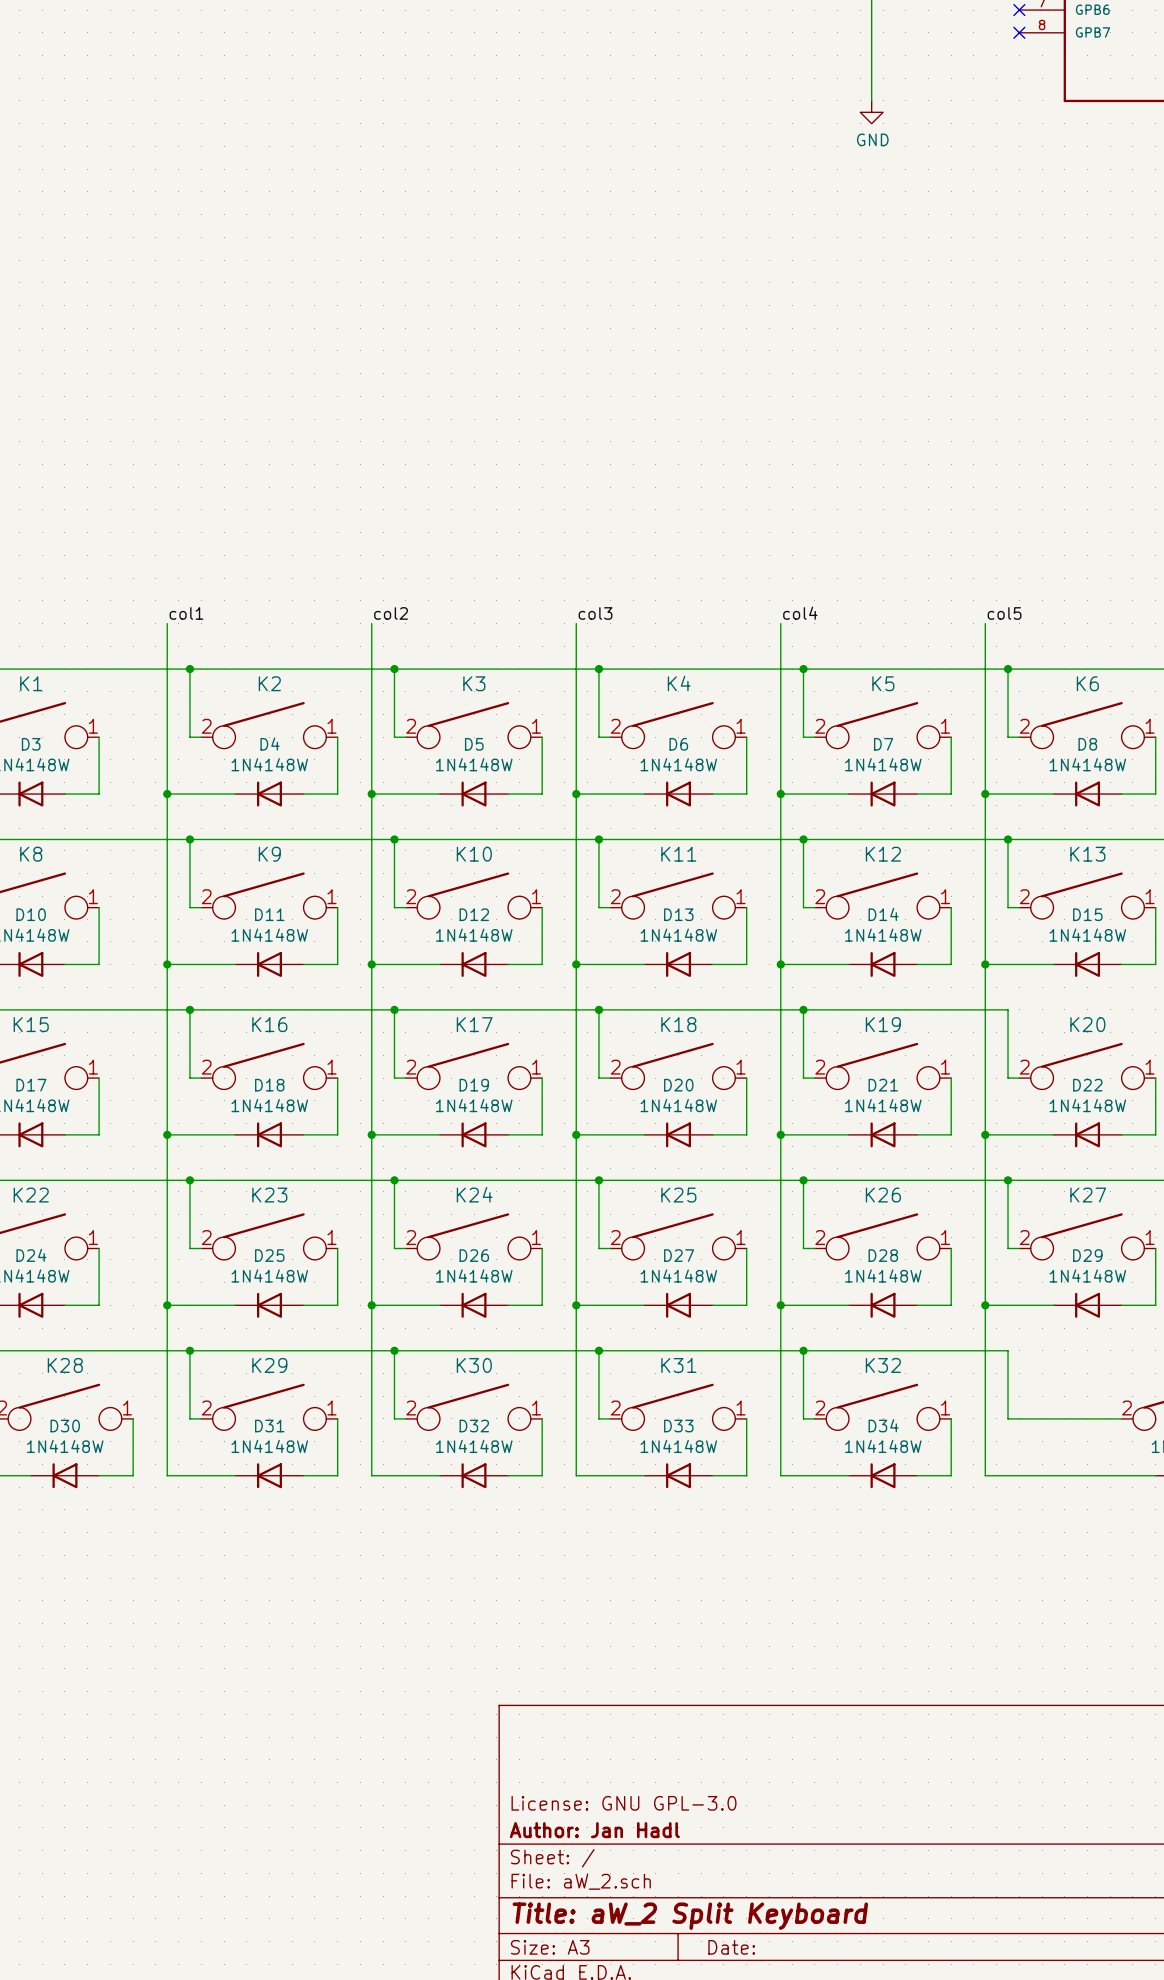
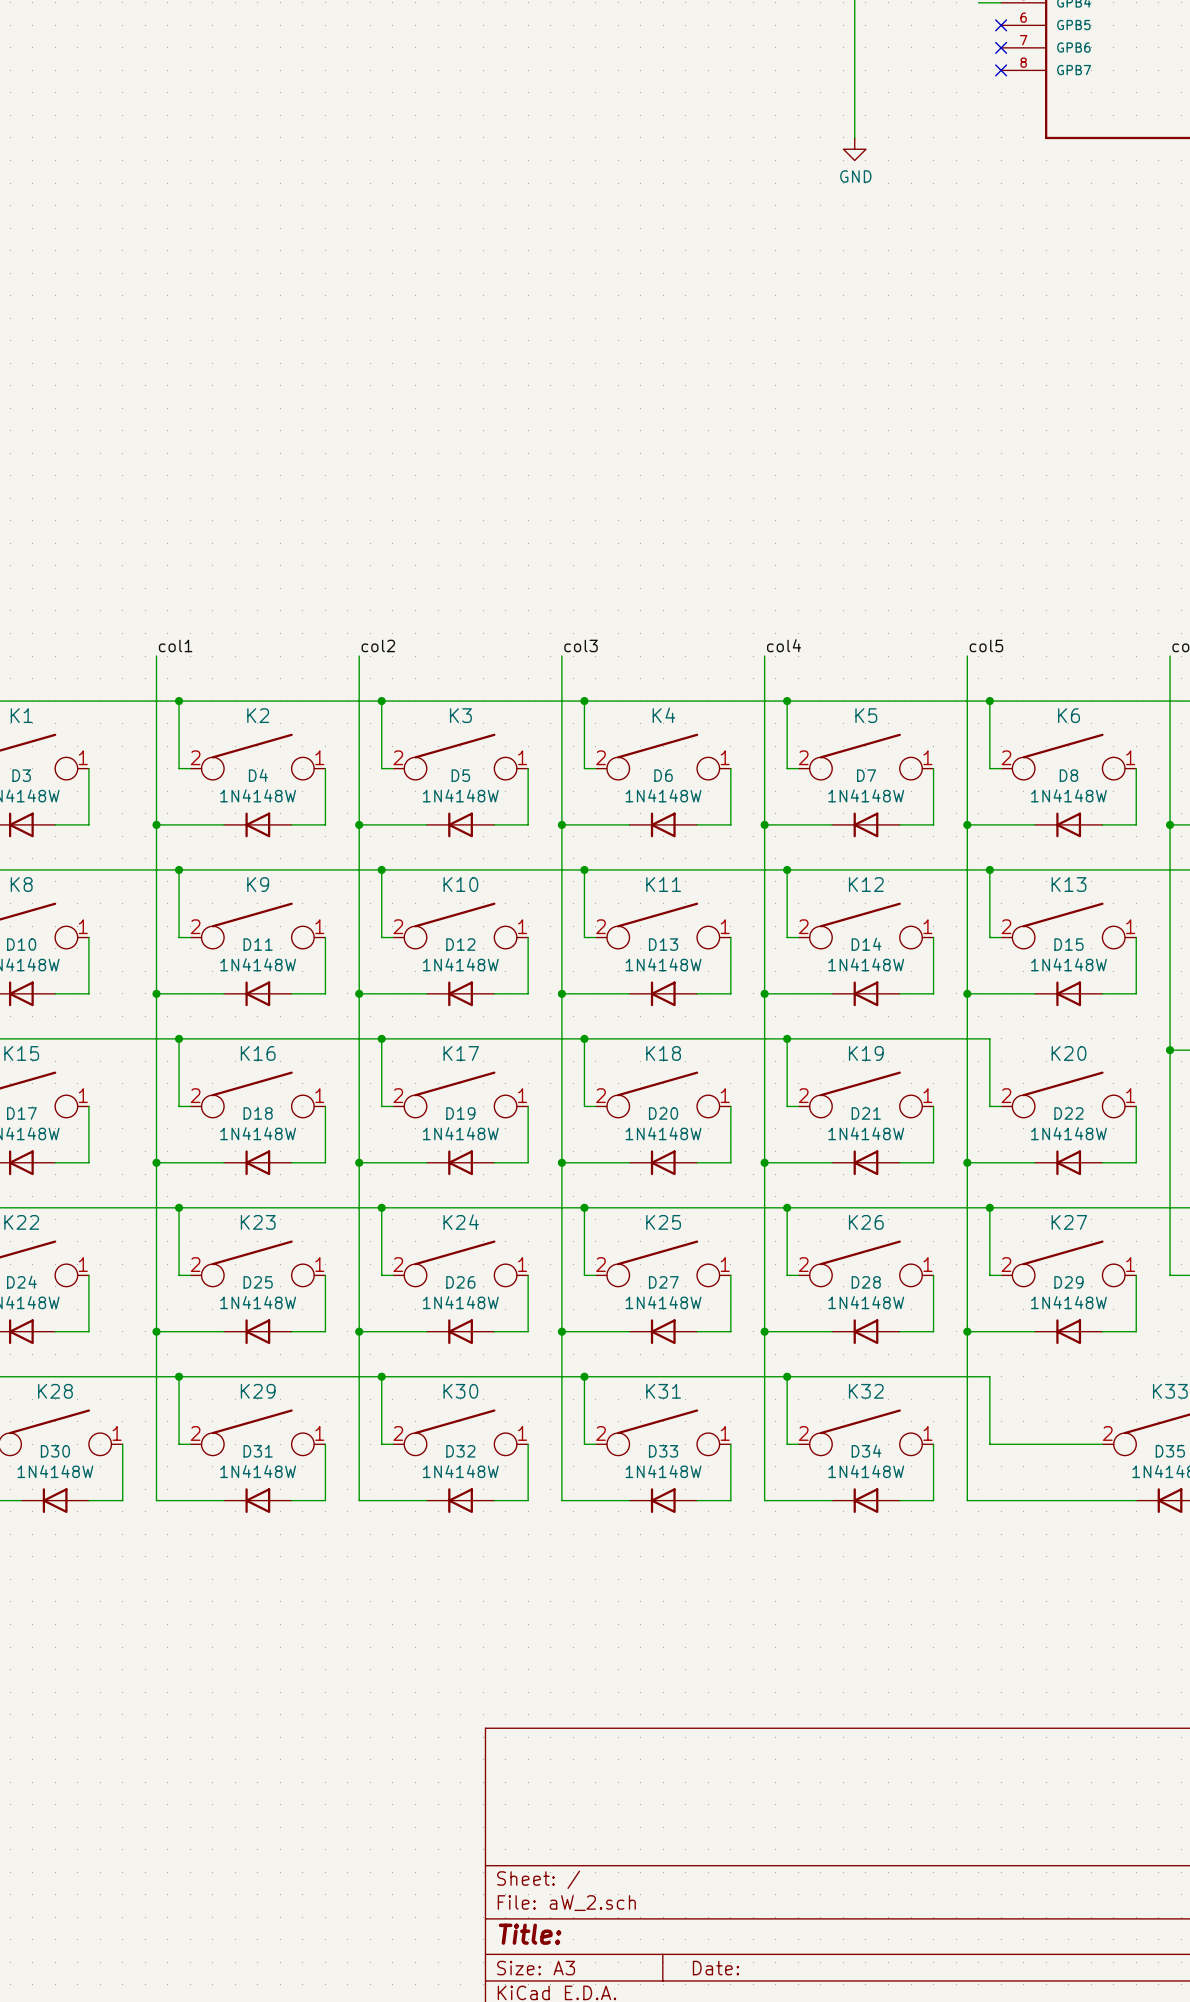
title block: License: GNU GPL-3.0 (624, 1803) -> none
title block: Author: Jan Hadl (594, 1830) -> none
title block: Title: aW_2 Split Keyboard (690, 1916) -> Title: (530, 1934)

